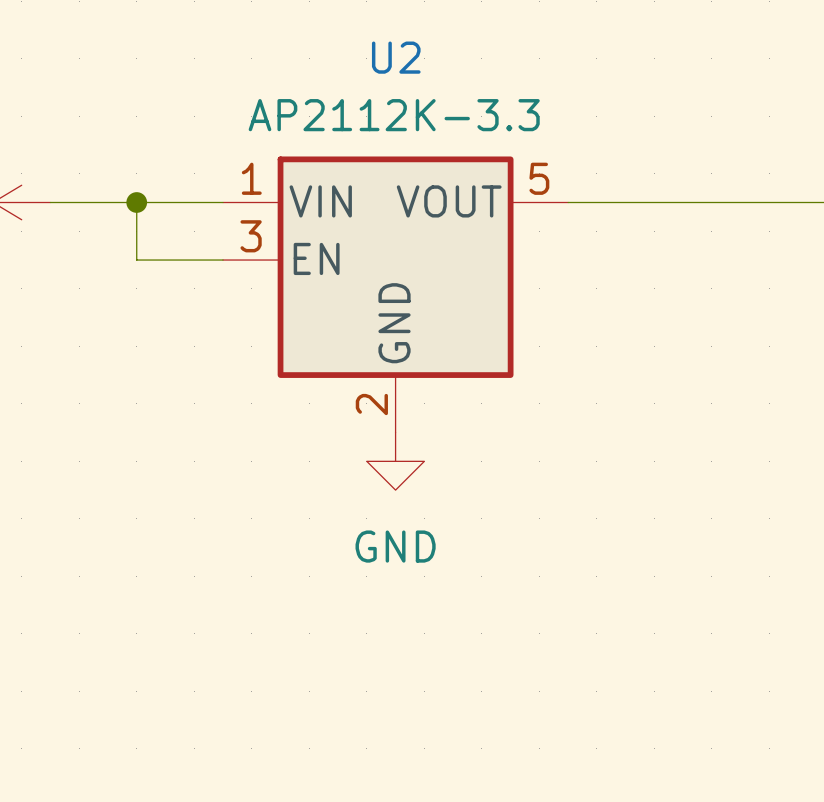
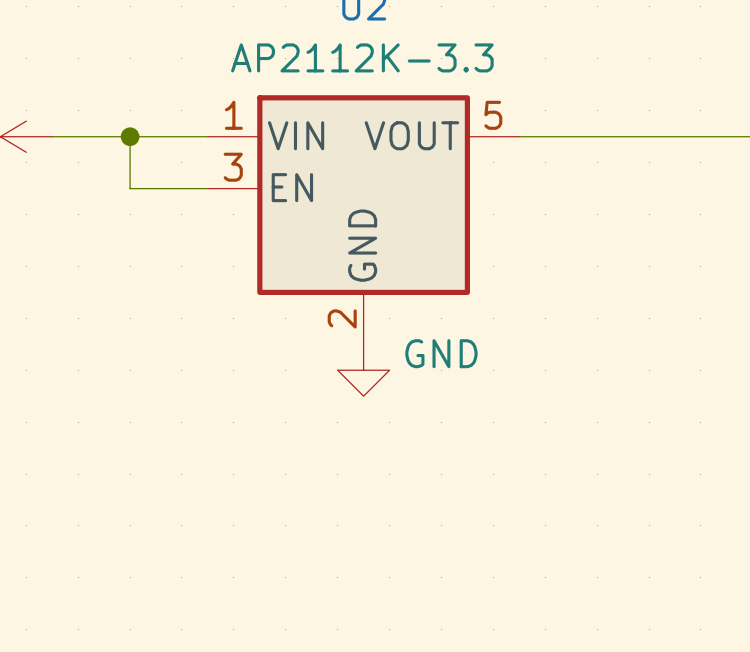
power symbol text position: GND (395, 546) -> GND (441, 353)

